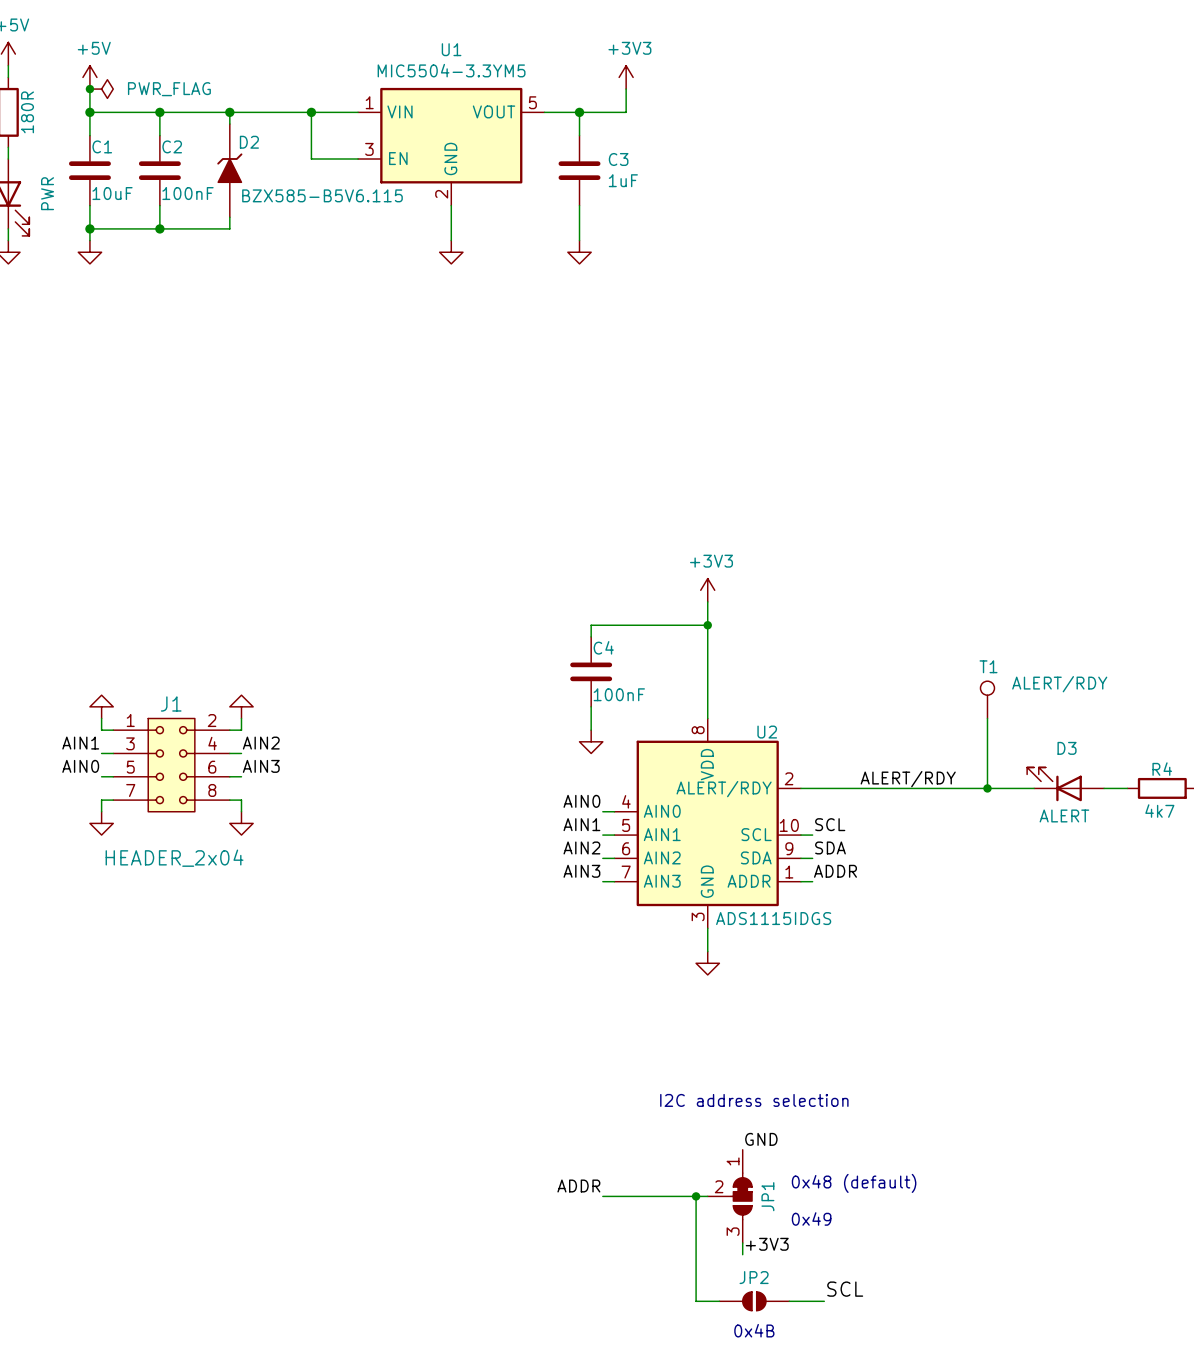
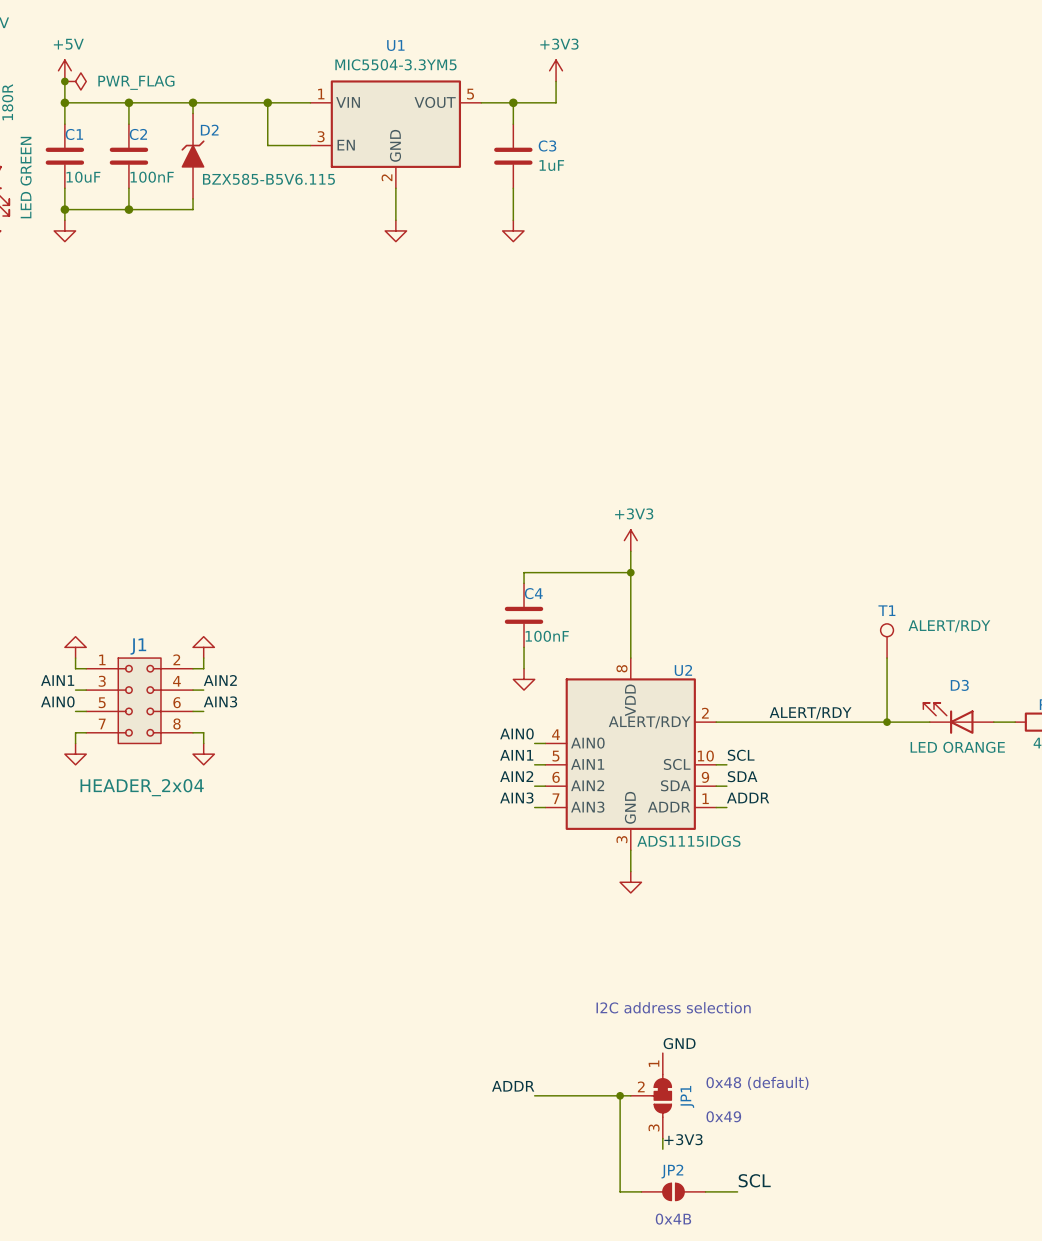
part value: PWR (47, 193) -> LED GREEN (26, 177)
D3 value: ALERT (1064, 815) -> LED ORANGE (957, 747)

